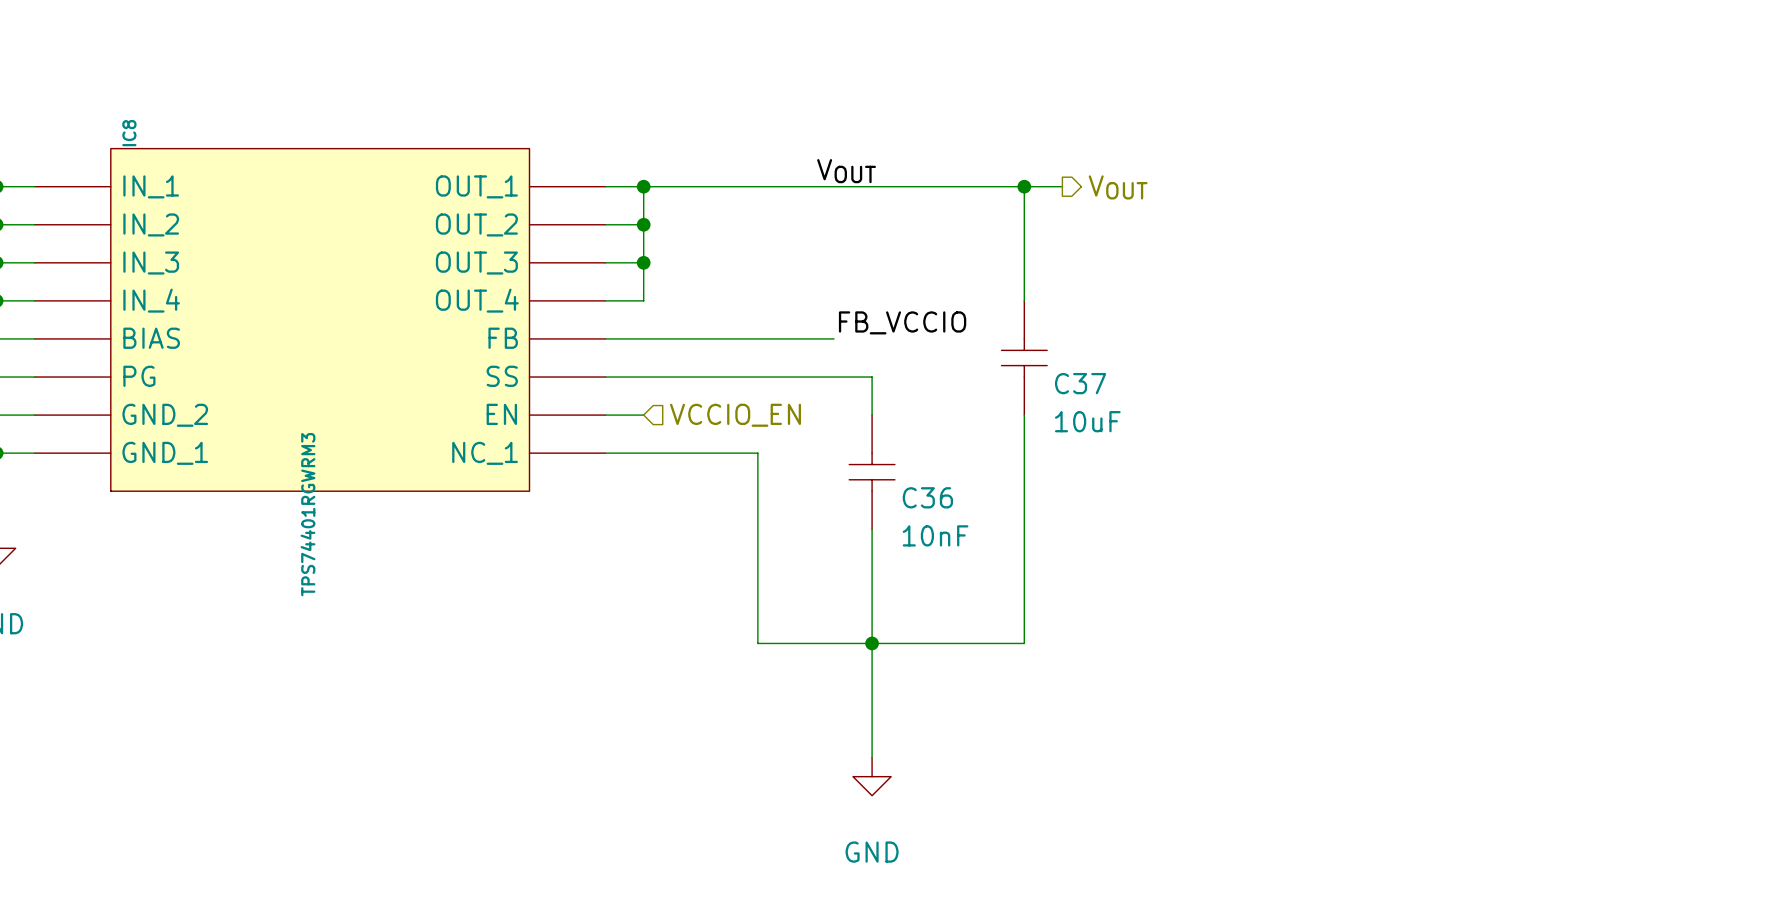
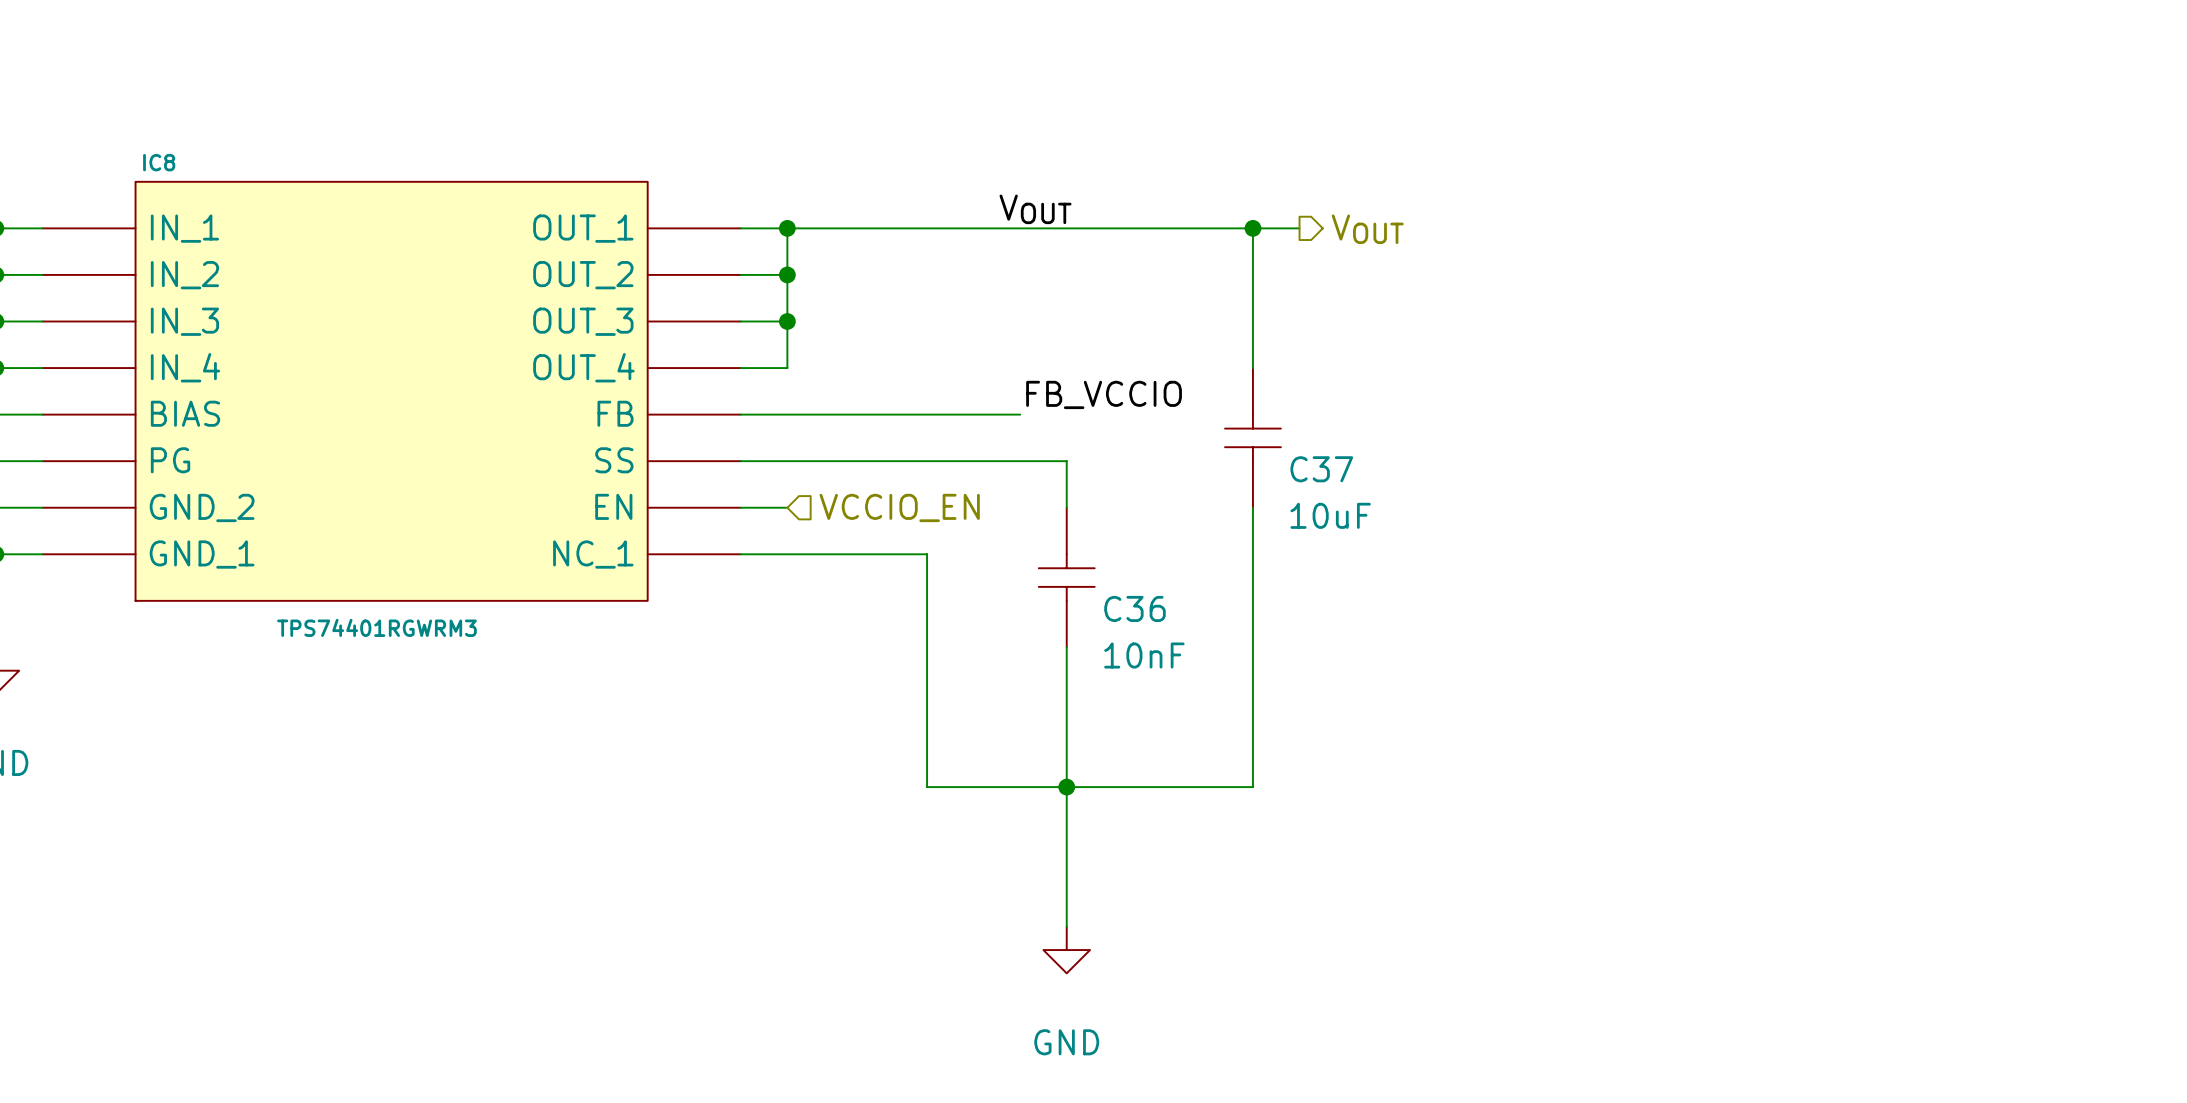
IC8 name rotation: 0° (129, 133) -> 90° clockwise (159, 162)
IC8 value rotation: 0° (308, 514) -> 90° clockwise (376, 627)

